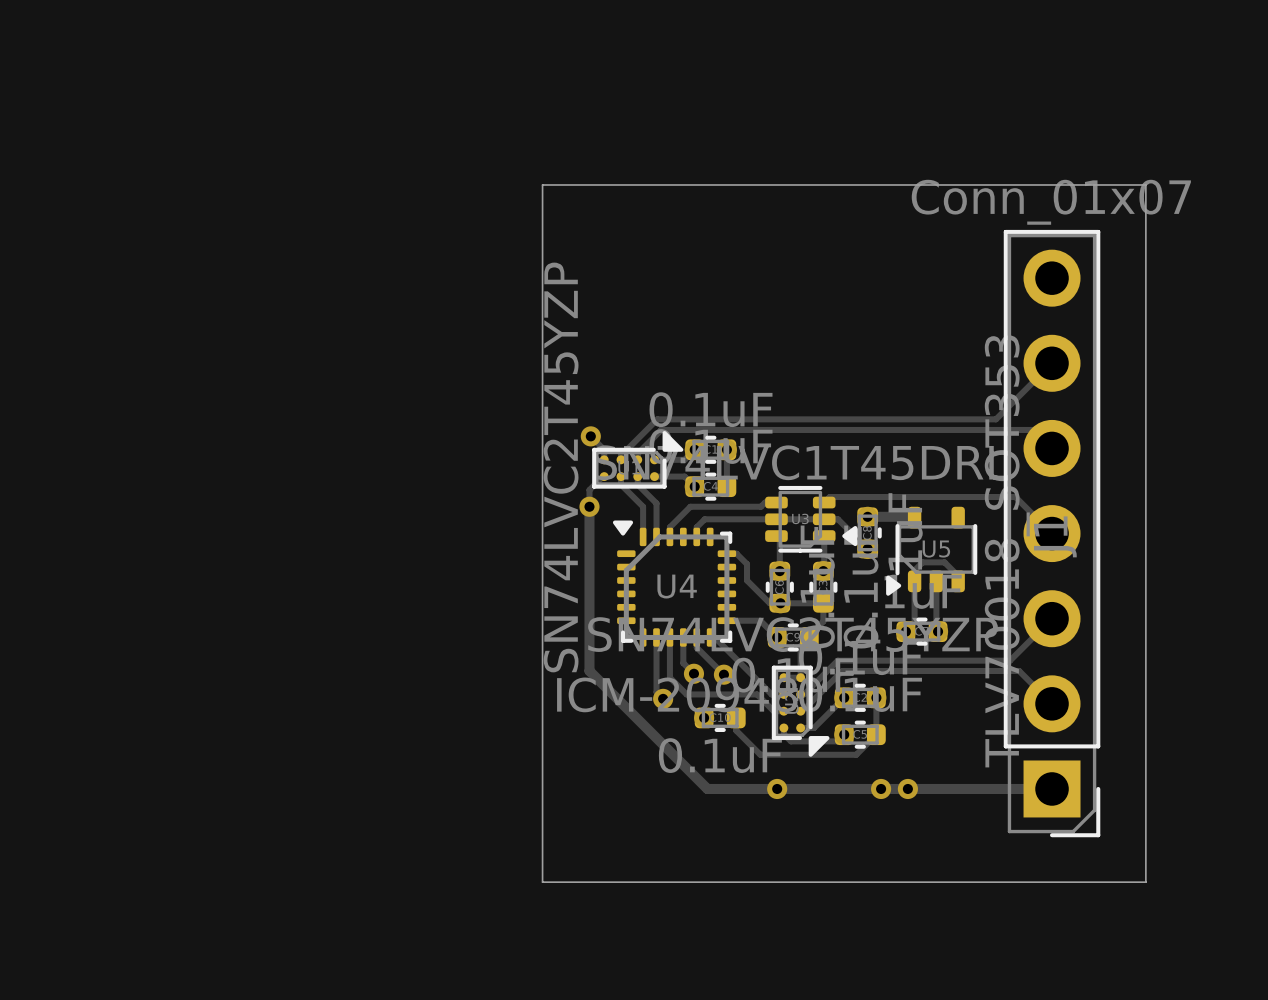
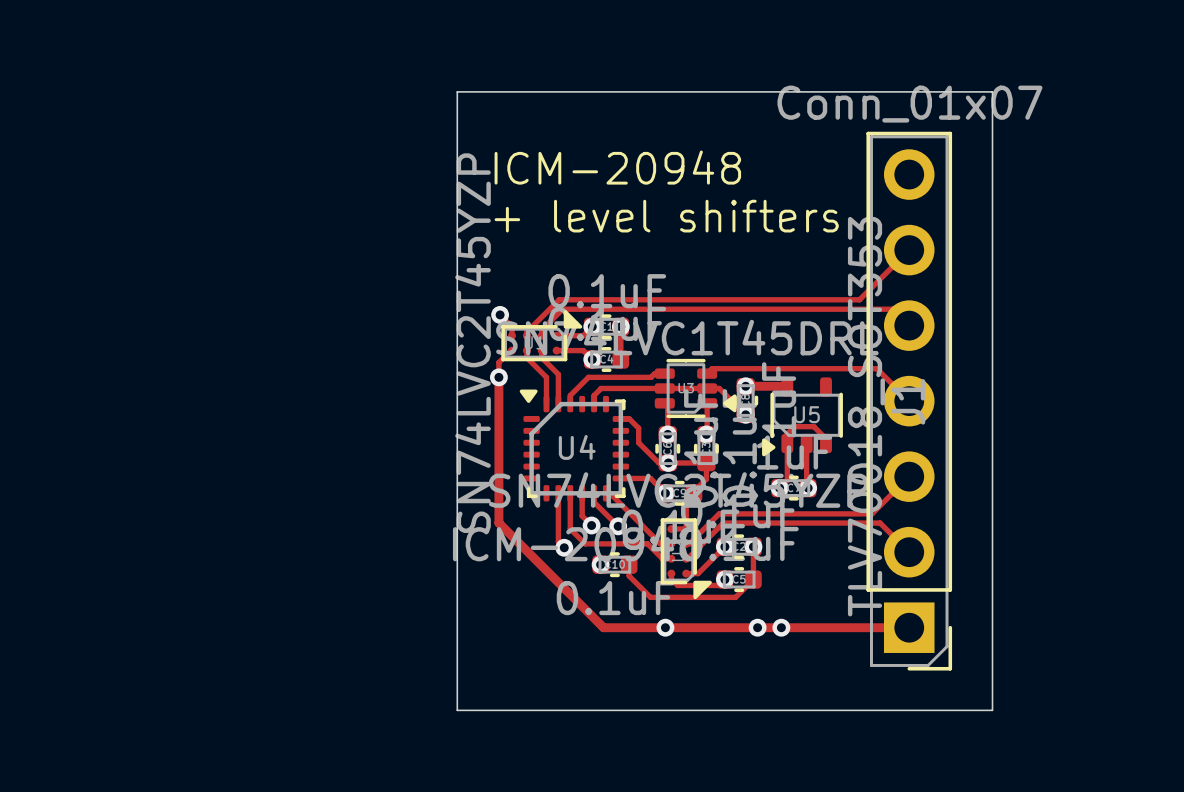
text: none -> ICM-20948 (617, 167)
text: none -> + level shifters (666, 216)

